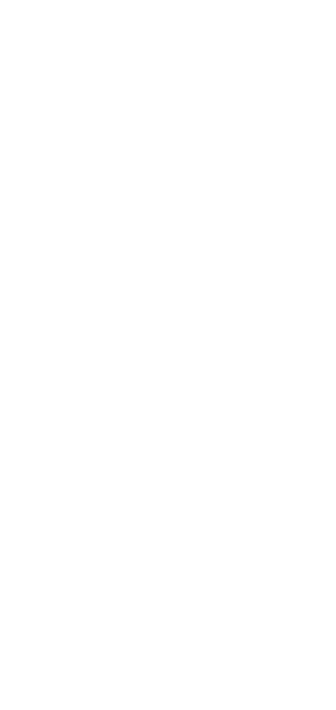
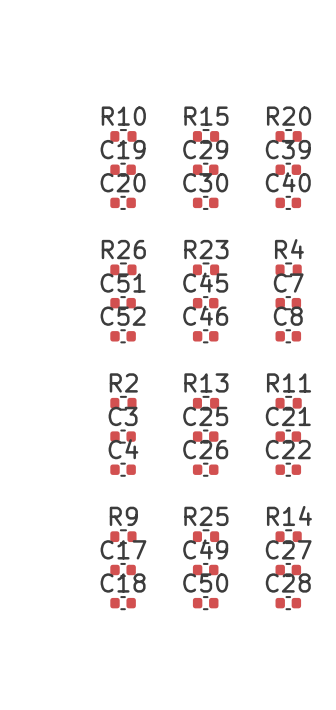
R10: none -> (123, 136)
R15: none -> (206, 136)
R20: none -> (288, 136)
C19: none -> (123, 169)
C29: none -> (205, 169)
C39: none -> (288, 169)
C20: none -> (123, 202)
C30: none -> (205, 202)
C40: none -> (288, 202)
R26: none -> (123, 269)
R23: none -> (206, 269)
R4: none -> (288, 269)
C51: none -> (123, 303)
C45: none -> (205, 303)
C7: none -> (288, 303)
C52: none -> (123, 336)
C46: none -> (205, 336)
C8: none -> (288, 336)
R2: none -> (123, 403)
R13: none -> (206, 403)
R11: none -> (288, 403)
C3: none -> (123, 436)
C25: none -> (205, 436)
C21: none -> (288, 436)
C4: none -> (123, 469)
C26: none -> (205, 469)
C22: none -> (288, 469)
R9: none -> (123, 536)
R25: none -> (206, 536)
R14: none -> (288, 536)
C17: none -> (123, 569)
C49: none -> (205, 569)
C27: none -> (288, 569)
C18: none -> (123, 603)
C50: none -> (205, 603)
C28: none -> (288, 603)

